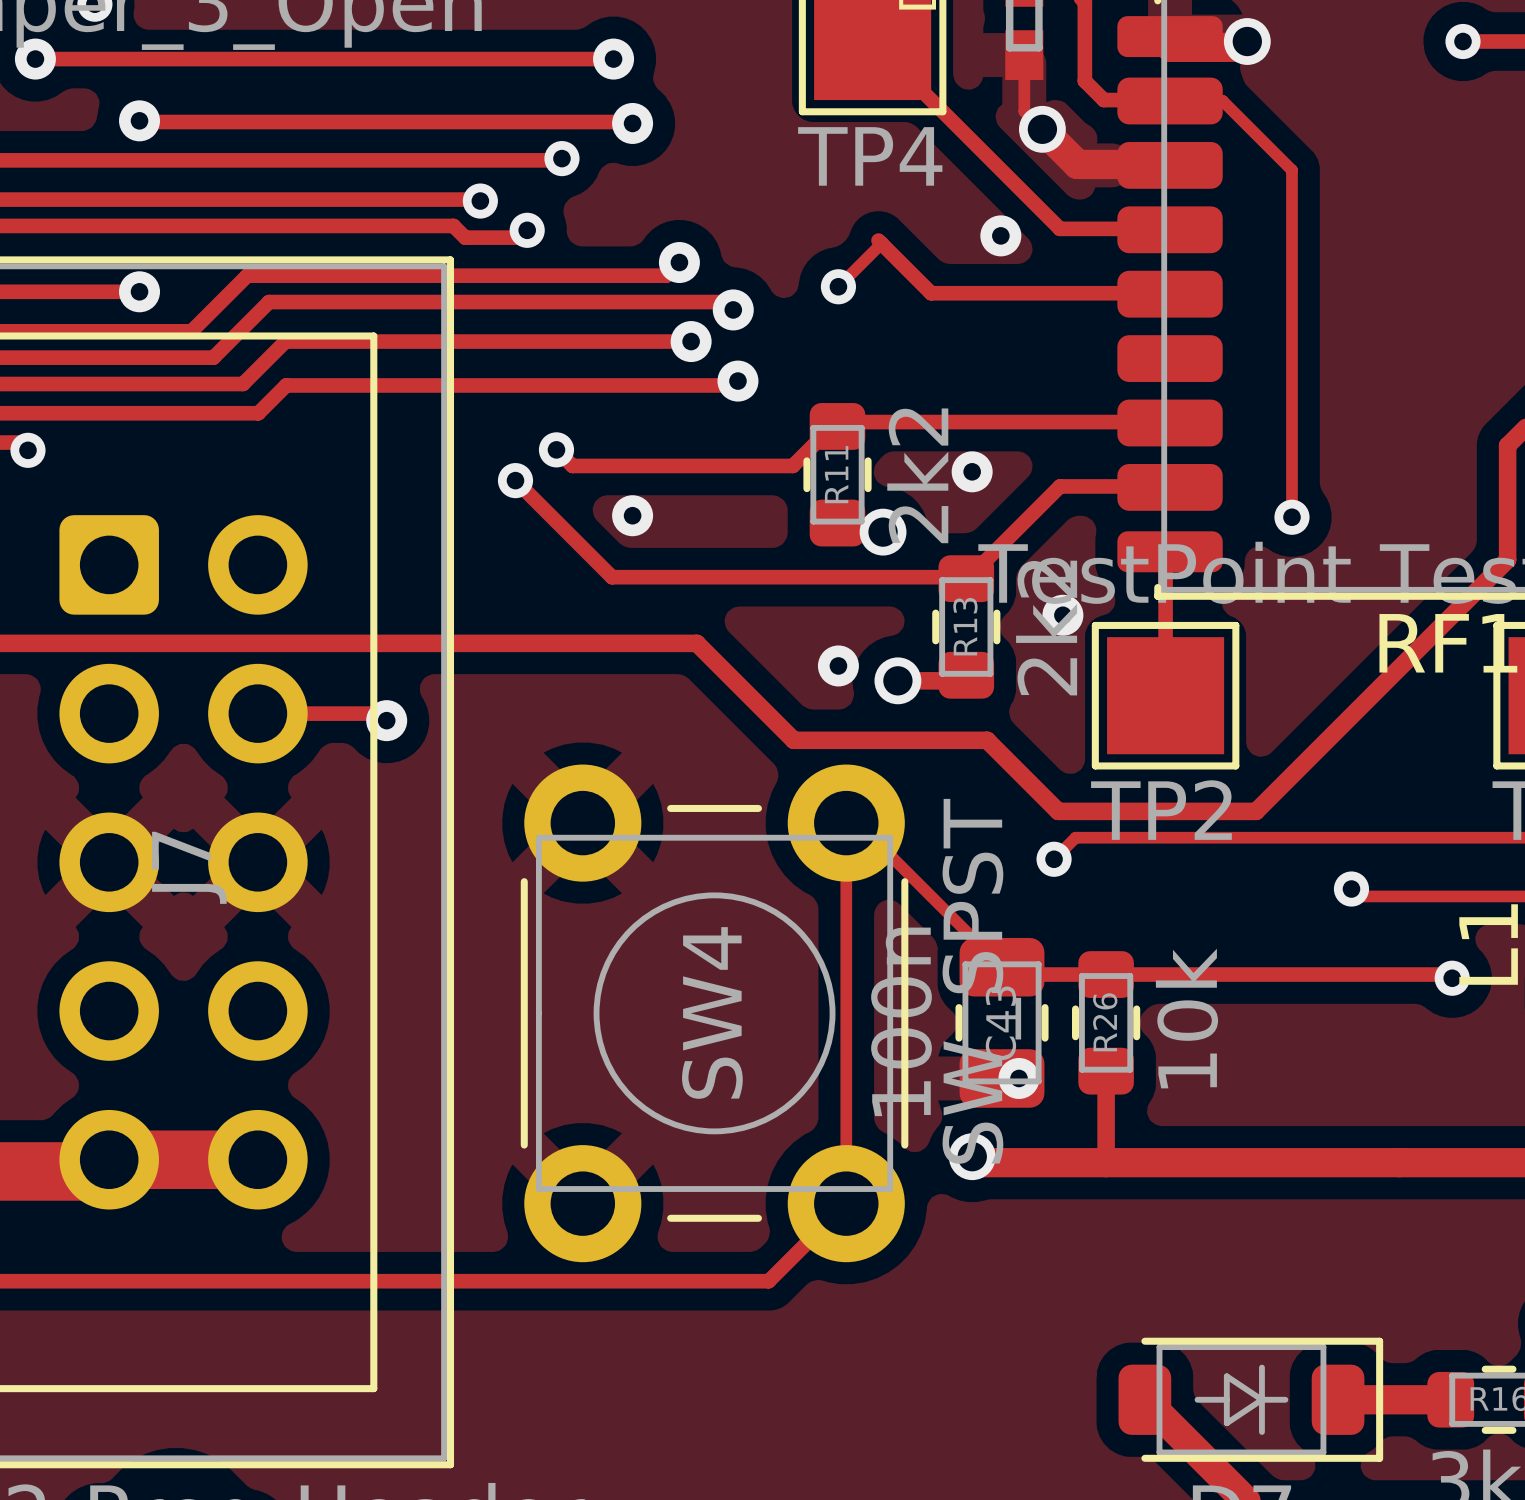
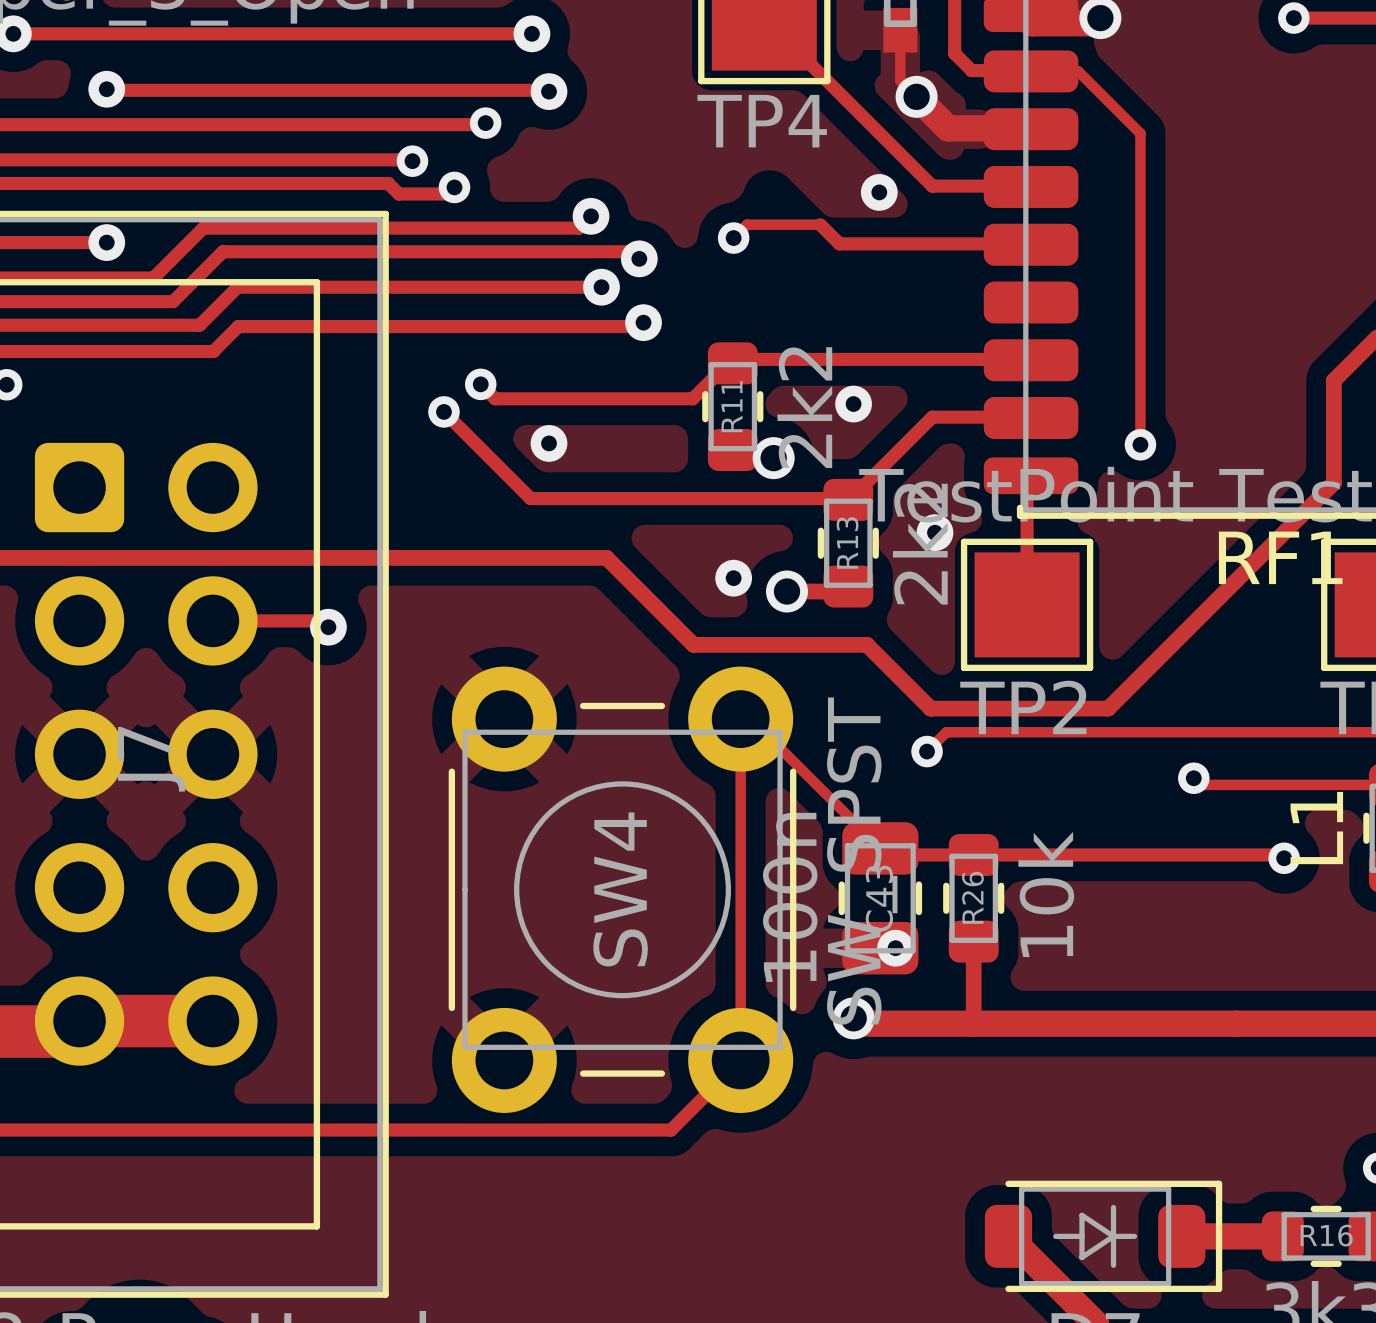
track: (878, 240) (931, 293) (956, 293) -> (746, 224) (820, 224) (839, 243)
track: (881, 243) (853, 271) -> none

